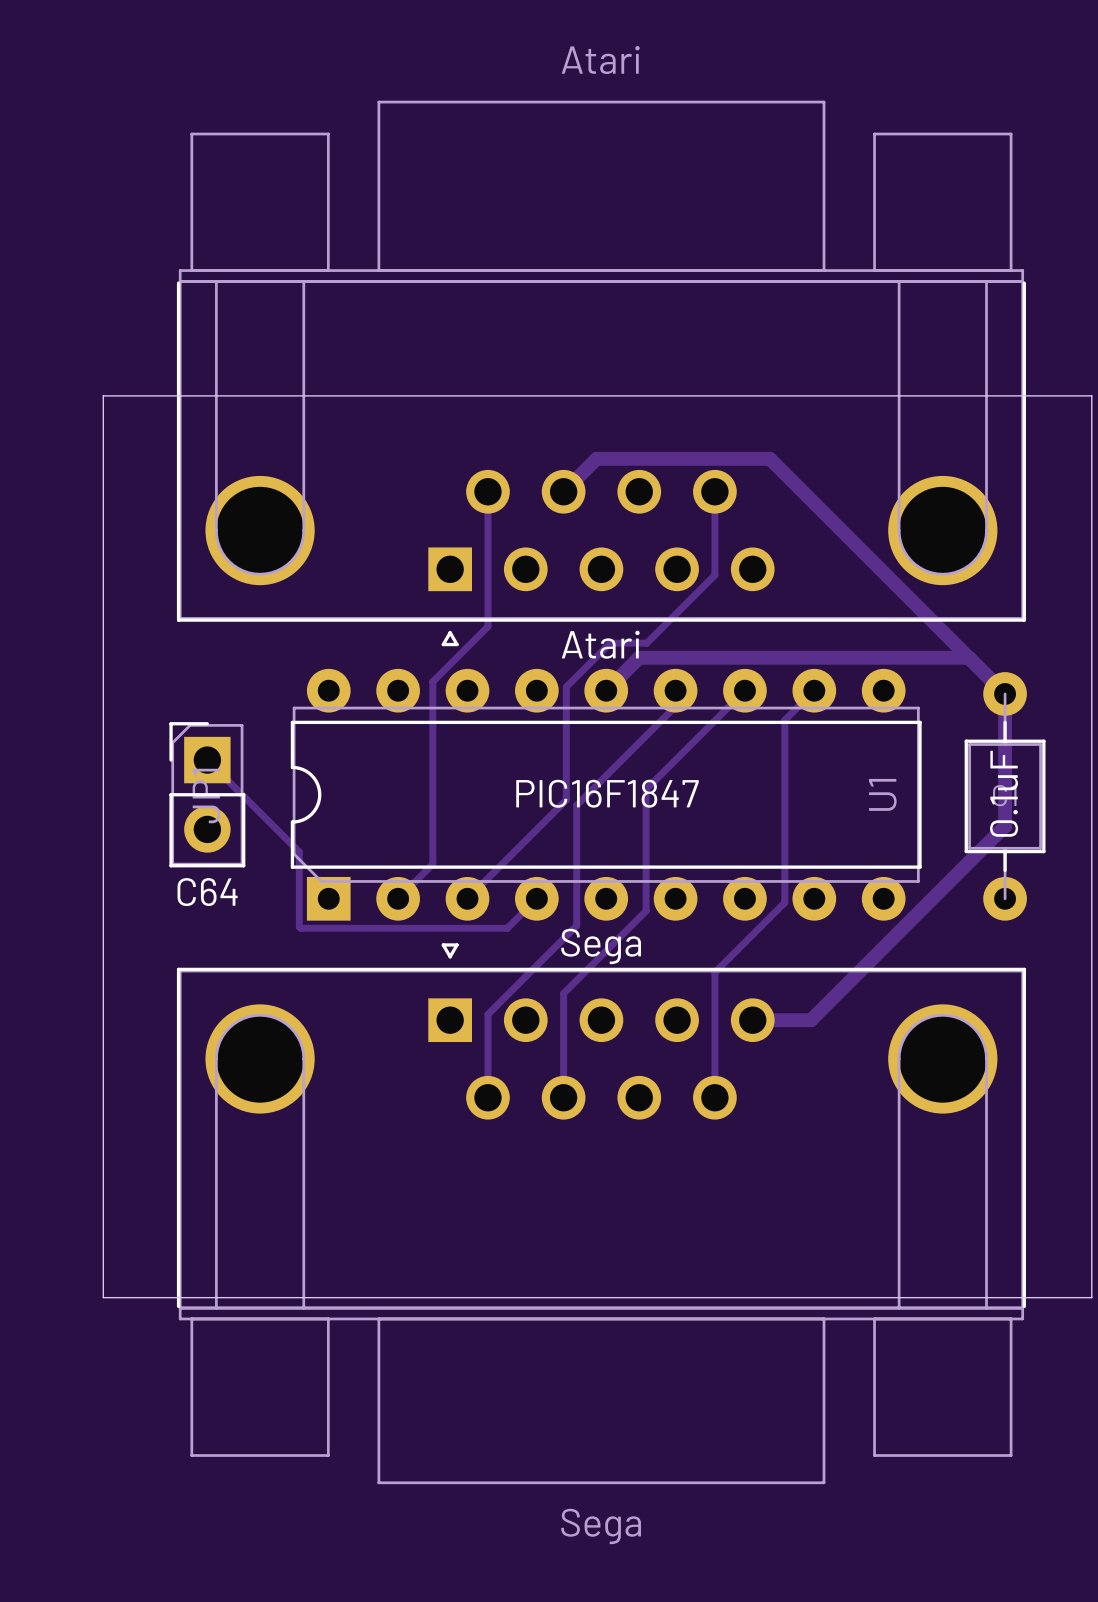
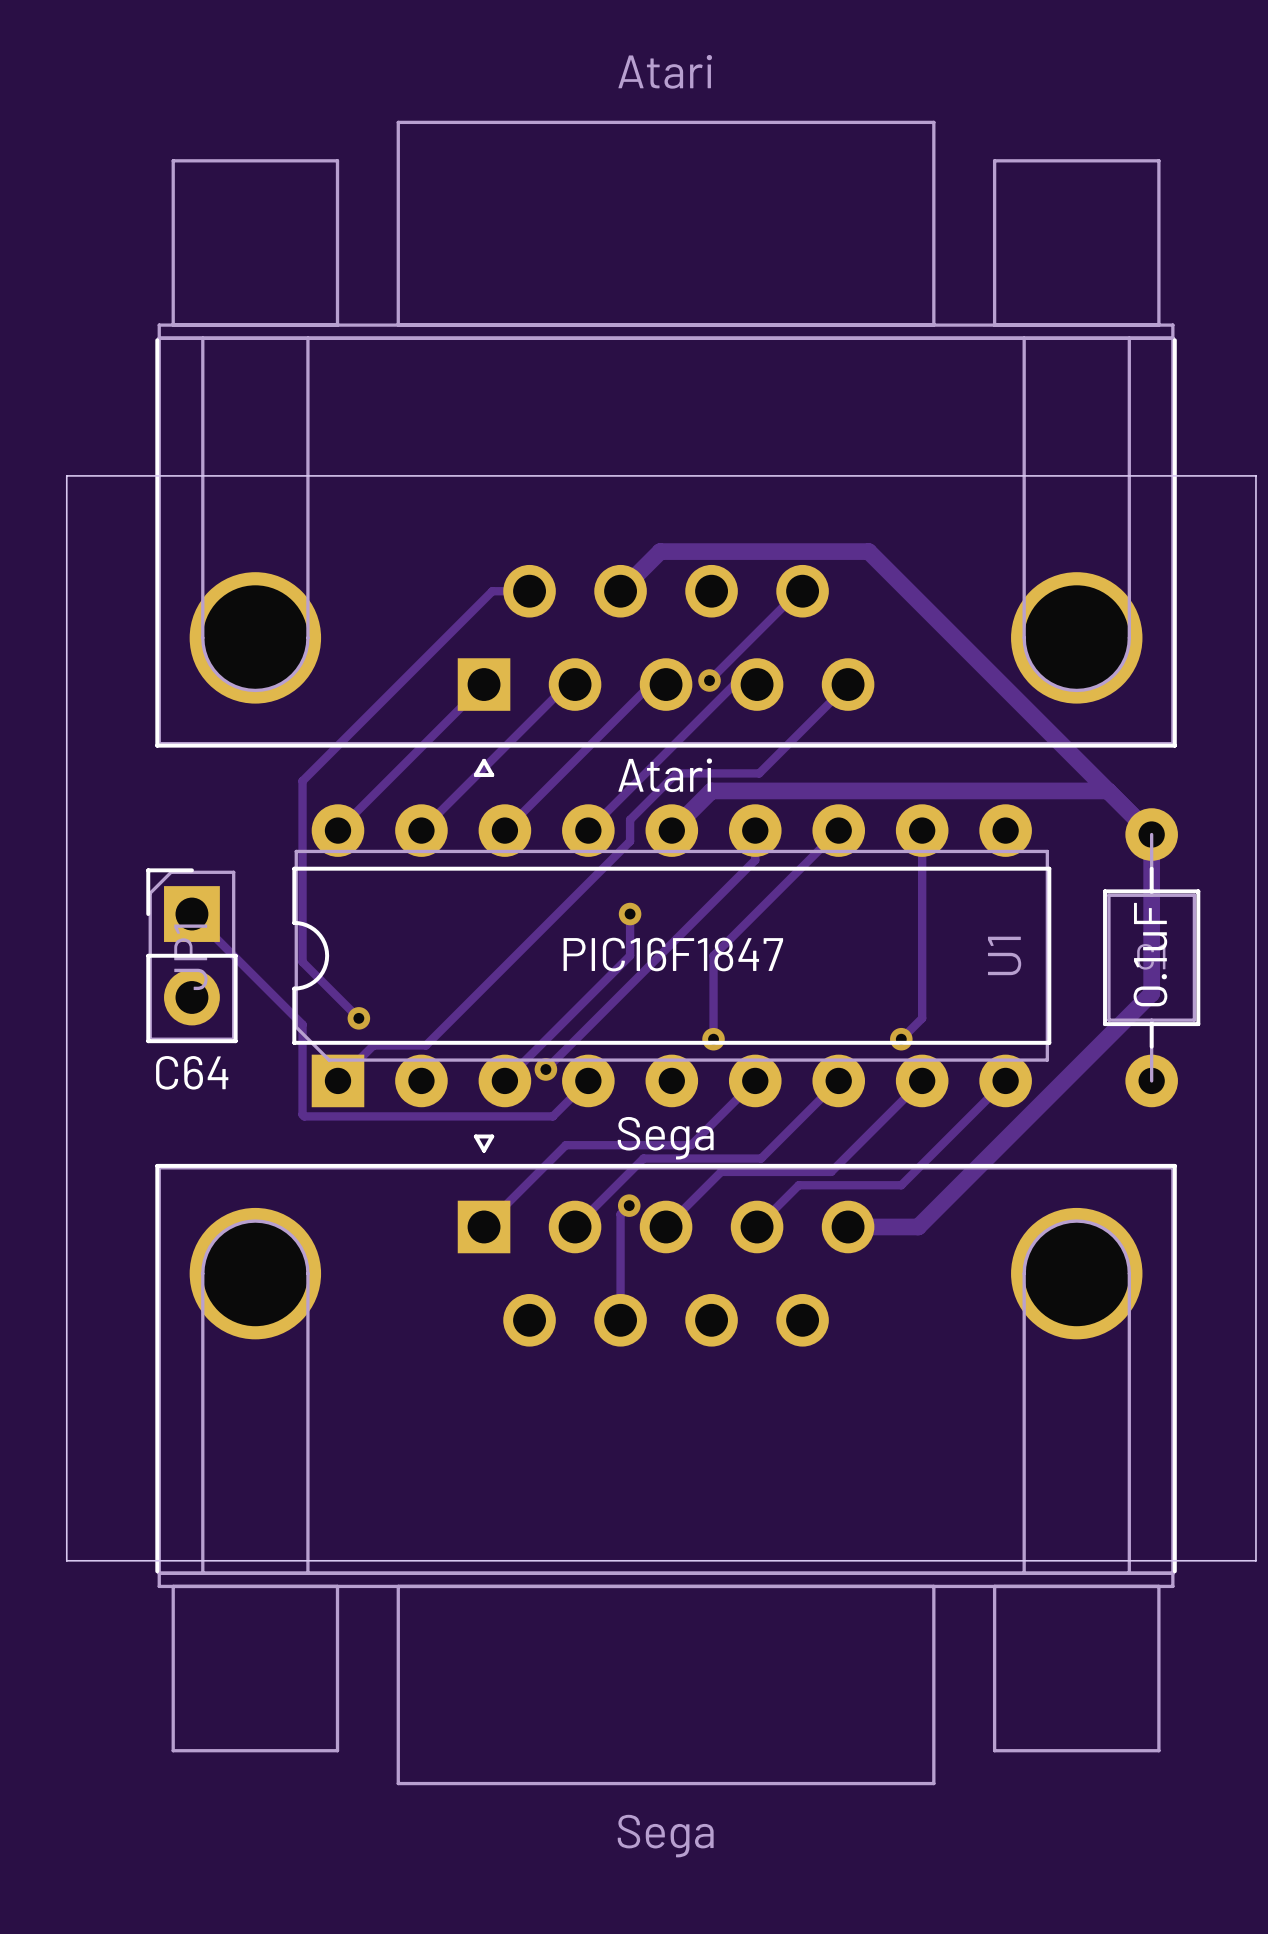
track: (487, 491) (487, 626) (432, 681) (432, 864) (398, 898) -> (529, 591) (492, 591) (302, 781) (302, 962) (358, 1018)
track: (714, 491) (714, 575) (646, 643) -> (802, 591) (798, 591) (709, 680)
via: none -> (709, 680)
track: none -> (484, 684) (337, 830)
track: none -> (567, 684) (421, 830)
track: none -> (650, 684) (504, 830)
track: none -> (734, 684) (588, 830)
track: none -> (848, 684) (759, 773) (720, 773)
track: (571, 681) (566, 686) (566, 799) -> (630, 914) (630, 955) (623, 962)
track: none -> (630, 819) (630, 841) (425, 1045) (373, 1045) (337, 1080)
track: (814, 690) (784, 720) (784, 902) (714, 972) (714, 1097) -> (922, 830) (922, 1018) (901, 1039)
track: (675, 706) (576, 805) (576, 925) (487, 1014) (487, 1097) -> (755, 849) (755, 860) (545, 1069)
via: none -> (630, 914)
track: (646, 789) (646, 910) (563, 993) (563, 1009) -> (719, 949) (713, 955) (713, 1039)
via: none -> (358, 1018)
via: none -> (713, 1039)
via: none -> (901, 1039)
via: none -> (545, 1069)
track: none -> (755, 1080) (691, 1145) (565, 1145) (484, 1226)
track: none -> (838, 1080) (761, 1158) (643, 1158) (575, 1226)
track: none -> (922, 1080) (831, 1171) (721, 1171) (666, 1226)
track: none -> (1005, 1080) (901, 1185) (798, 1185) (757, 1226)
via: none -> (629, 1205)

